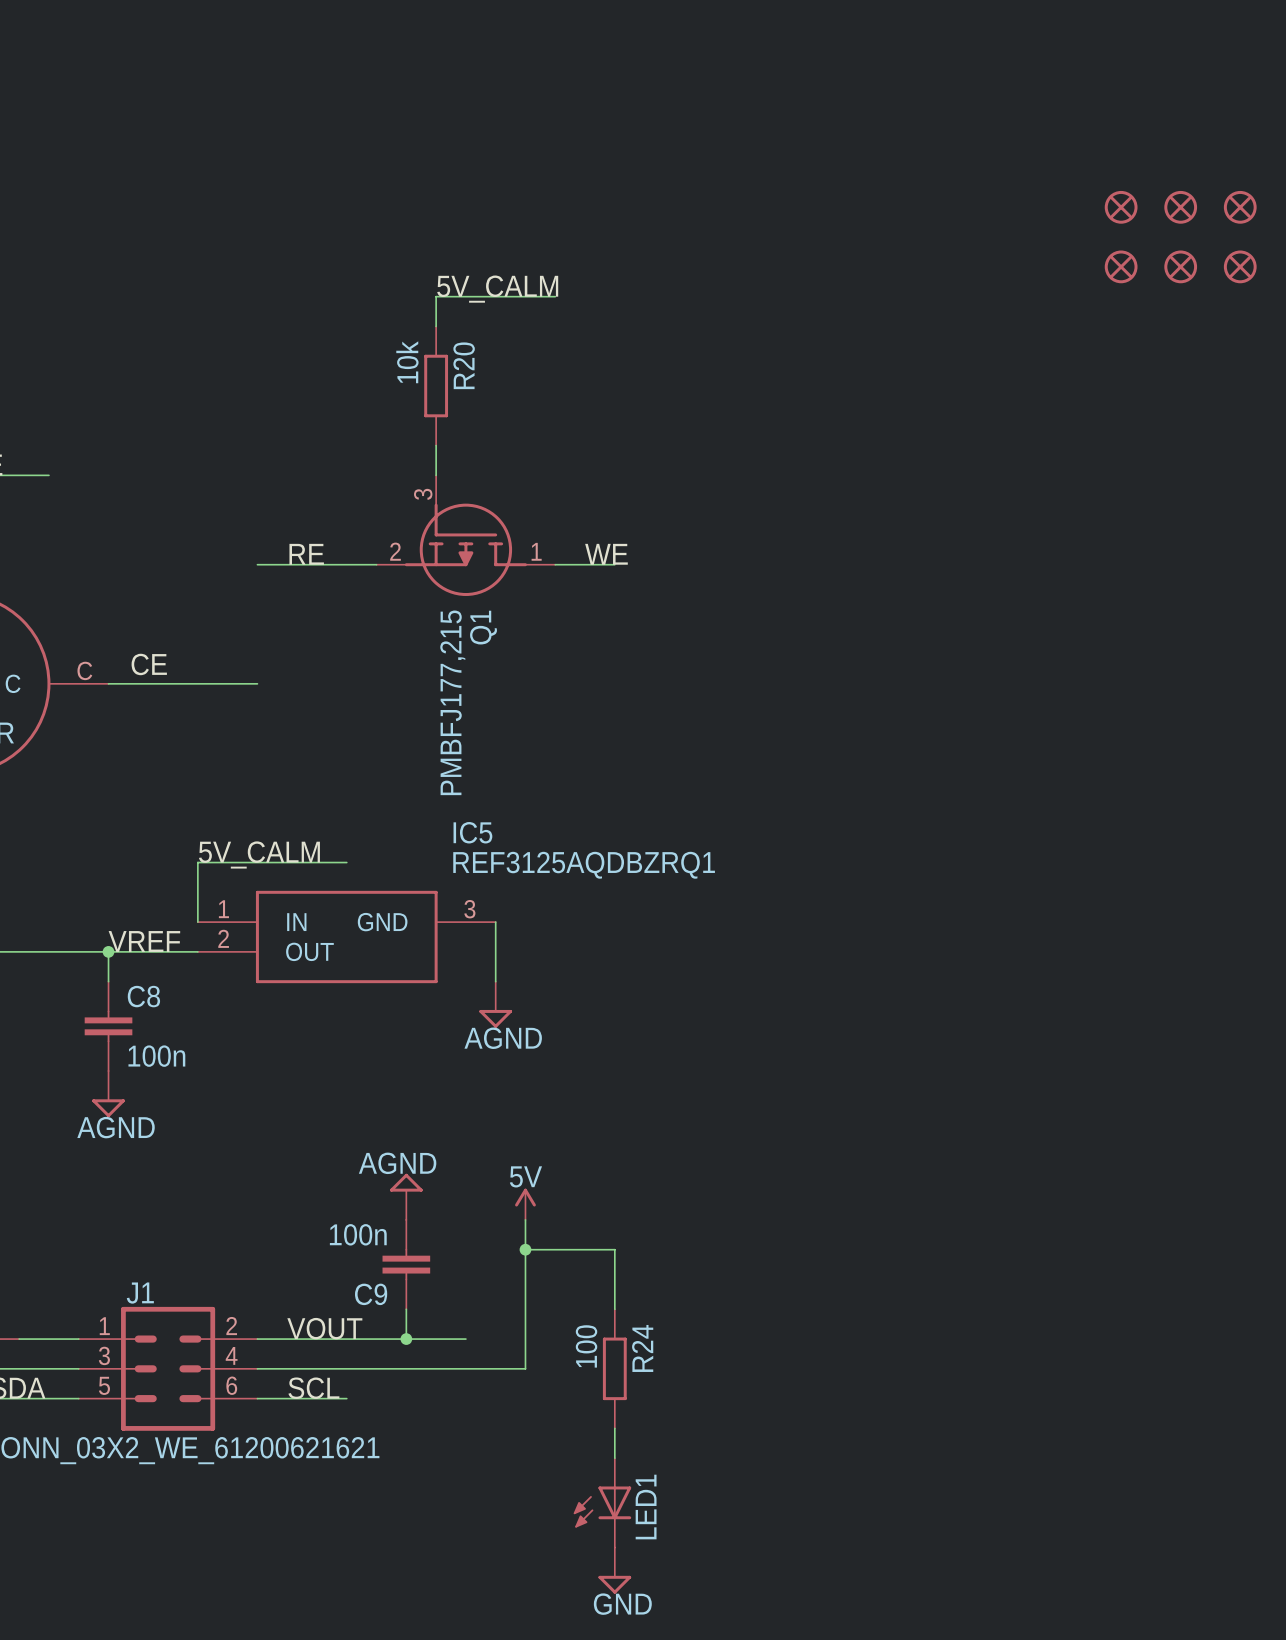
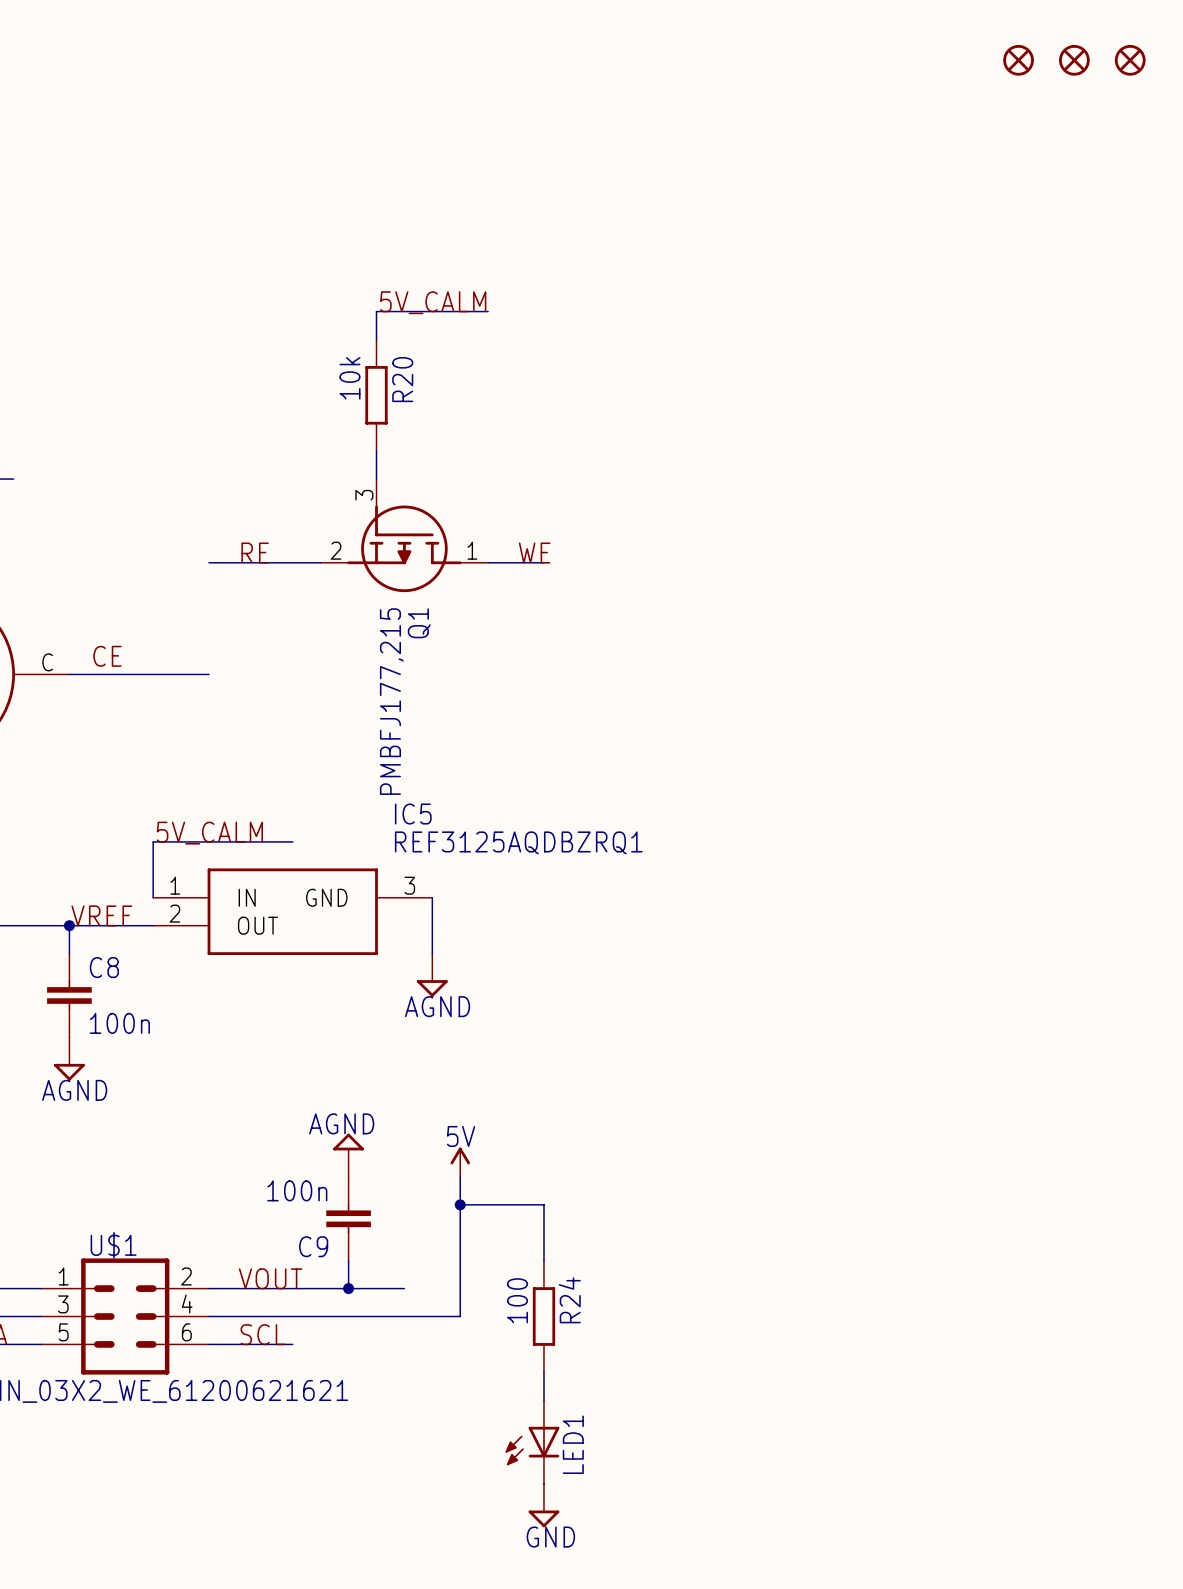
part: none -> (1018, 60)
part: none -> (1074, 60)
part: none -> (1130, 60)
part: (1121, 207) -> none
part: (1180, 207) -> none
part: (1240, 207) -> none
part: (1121, 266) -> none
part: (1180, 266) -> none
part: (1240, 266) -> none
J1 name: J1 (140, 1293) -> U$1 (113, 1245)

